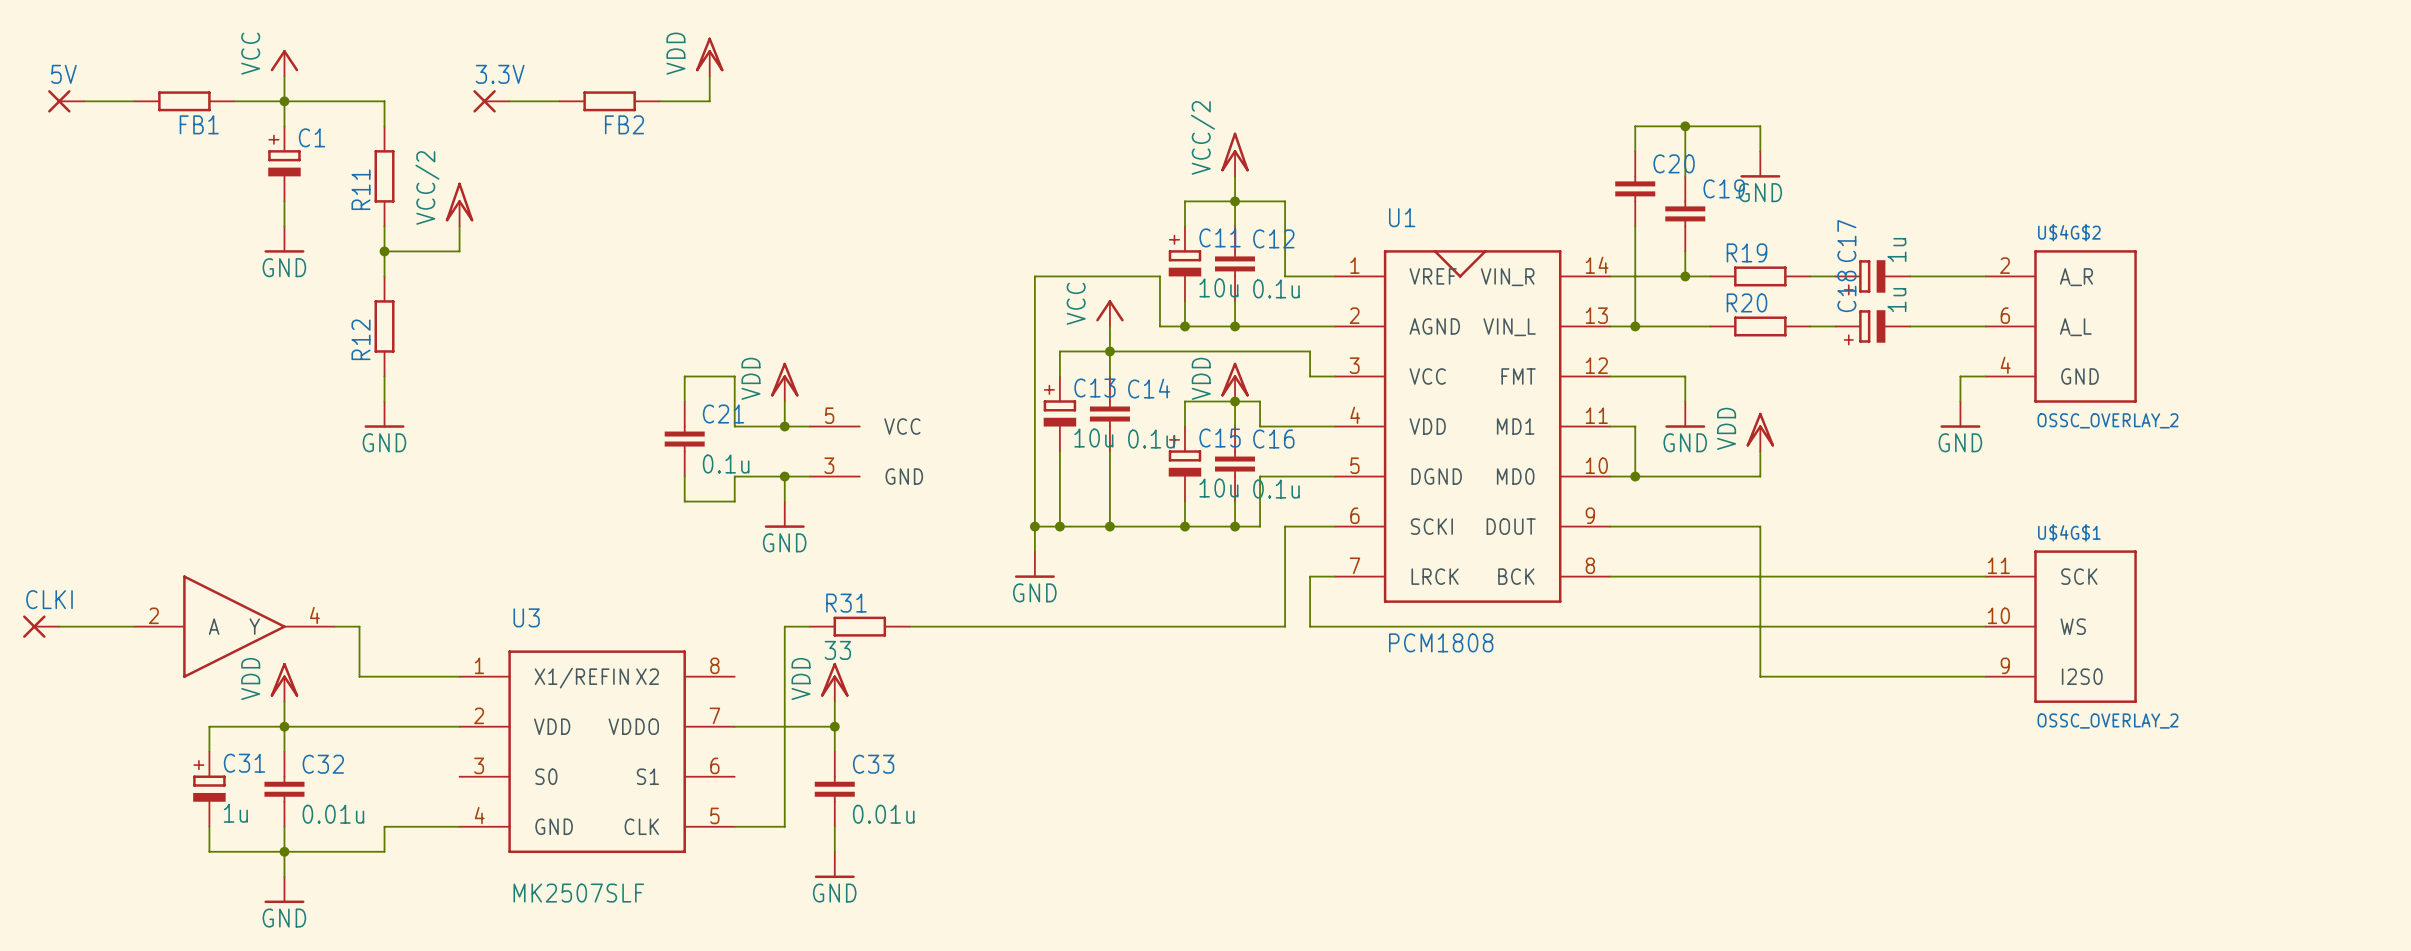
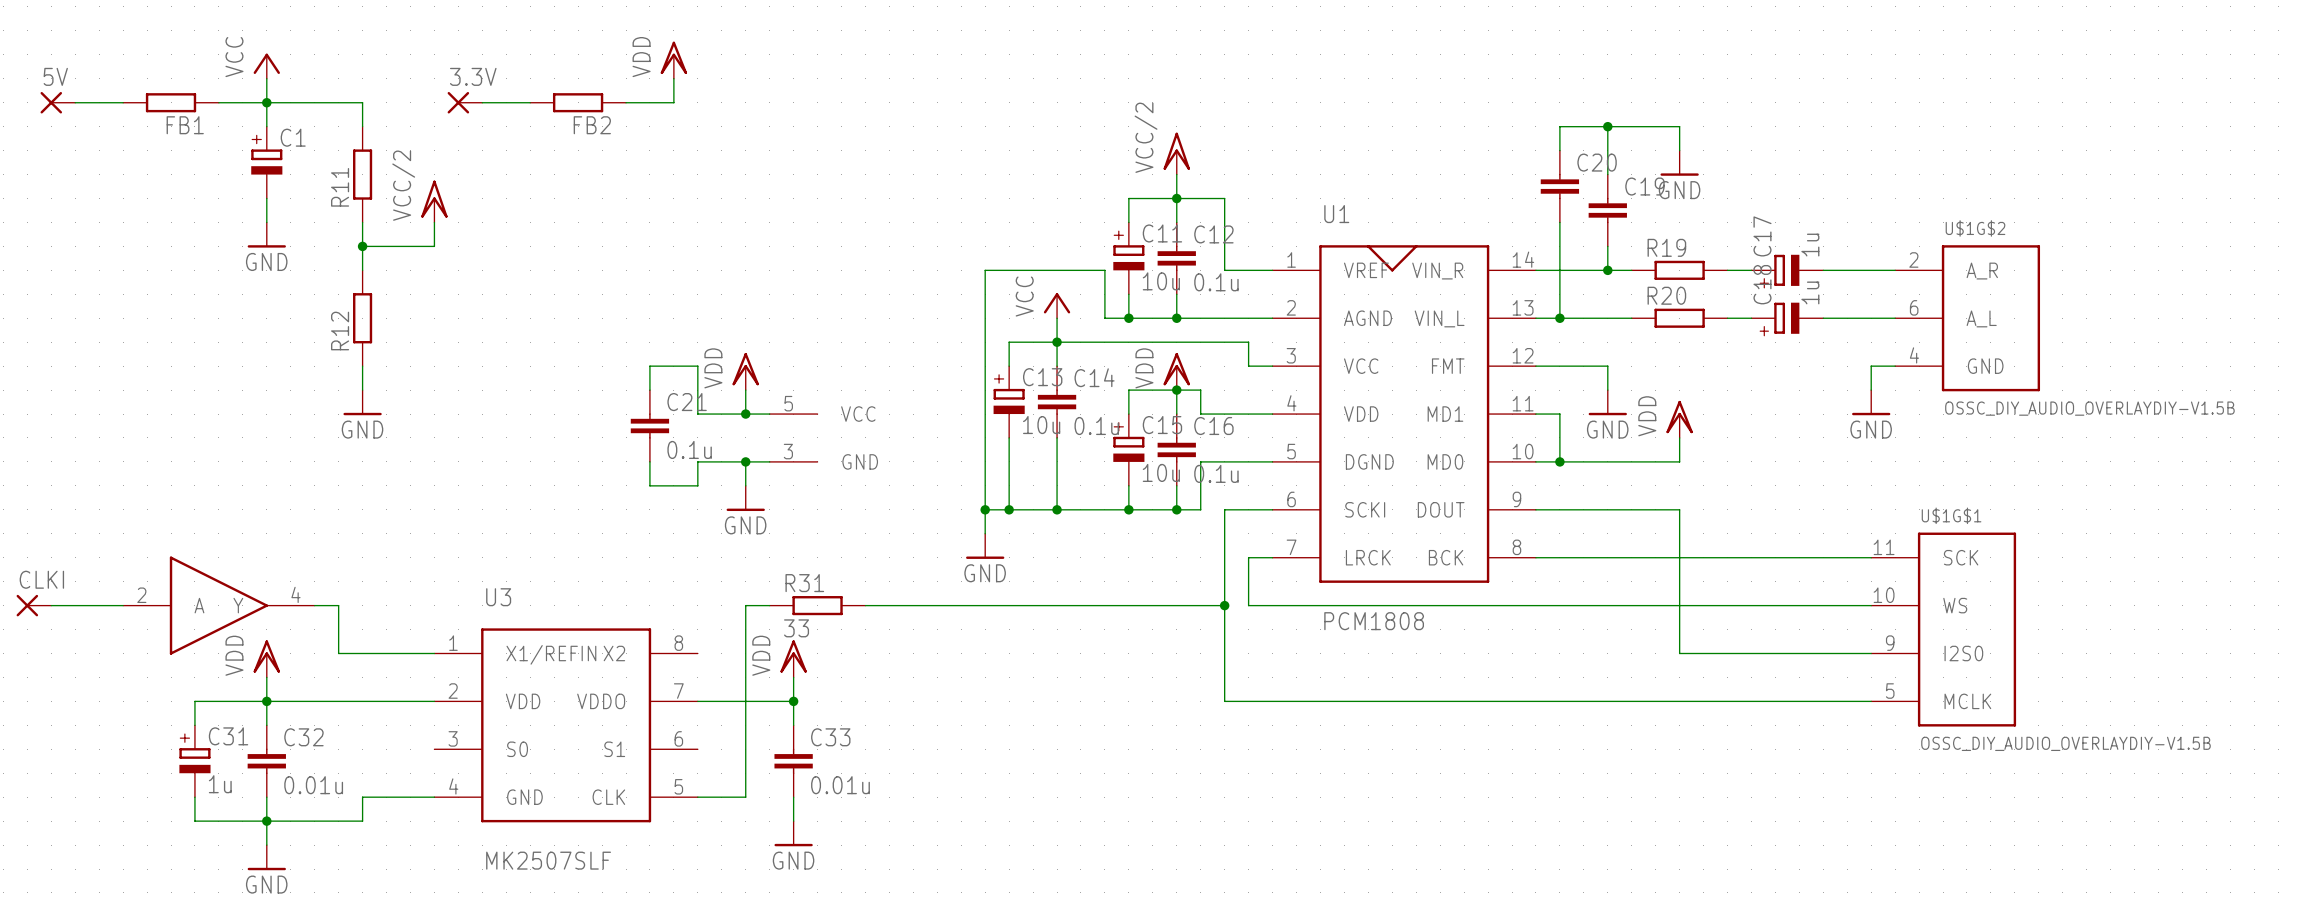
U$4G$2 name: U$4G$2 (2069, 232) -> U$1G$2 (1975, 228)
U$4G$2 value: OSSC_OVERLAY_2 (2107, 420) -> OSSC_DIY_AUDIO_OVERLAYDIY-V1.5B (2089, 408)
wire: none -> (1224, 605) (1224, 701) (1871, 701)
junction: none -> (1224, 605)
U$4G$1: OSSC_OVERLAY_2 (2061, 626) -> none
U$1G$1: none -> OSSC_DIY_AUDIO_OVERLAYDIY-V1.5B (1943, 629)

